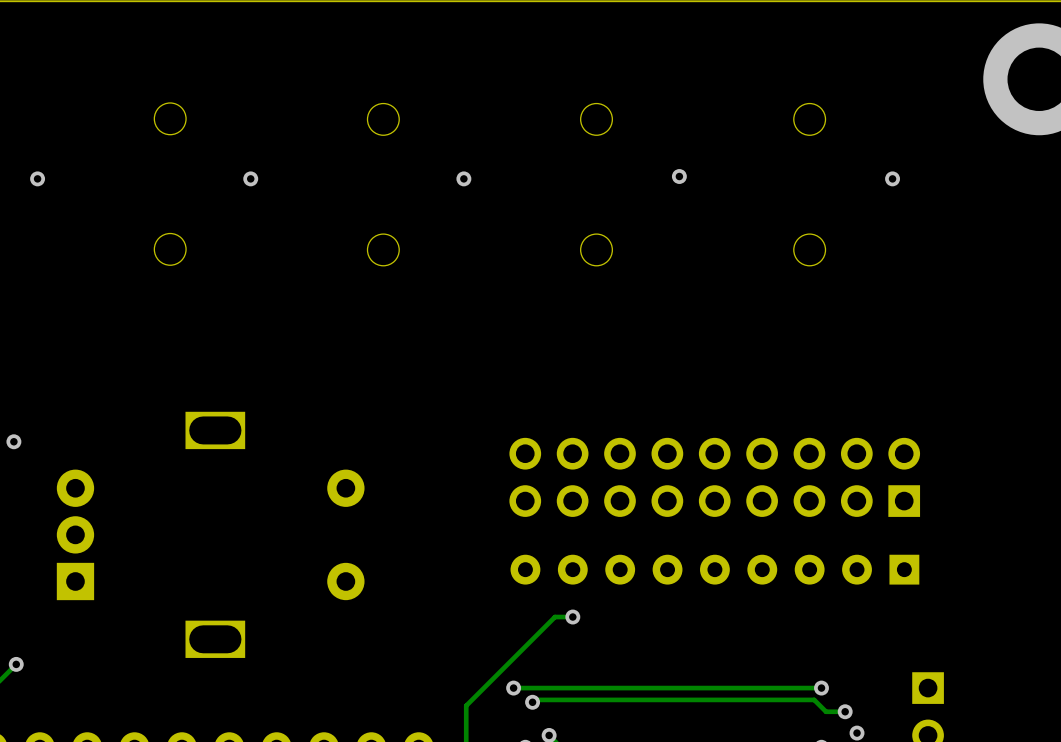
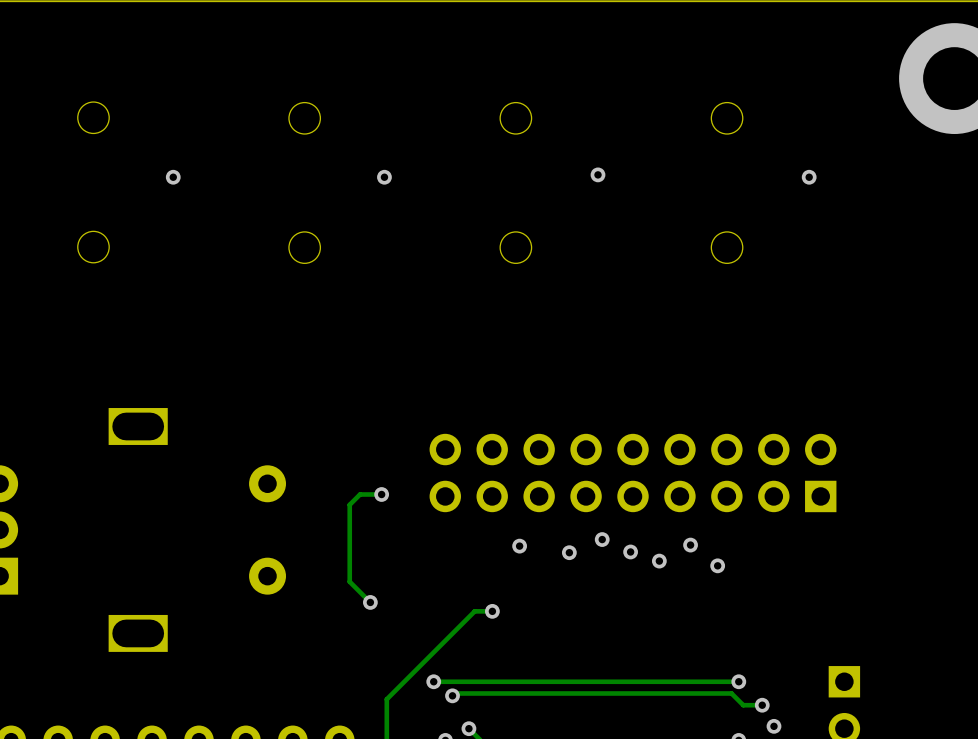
track: none -> (381, 494) (360, 494) (349, 504) (349, 581) (370, 602)
via: none -> (381, 494)
via: none -> (602, 539)
via: none -> (690, 545)
via: none -> (519, 546)
via: none -> (569, 552)
via: none -> (630, 551)
via: none -> (659, 561)
part: (714, 569) -> none
via: none -> (717, 565)
via: none -> (370, 602)

